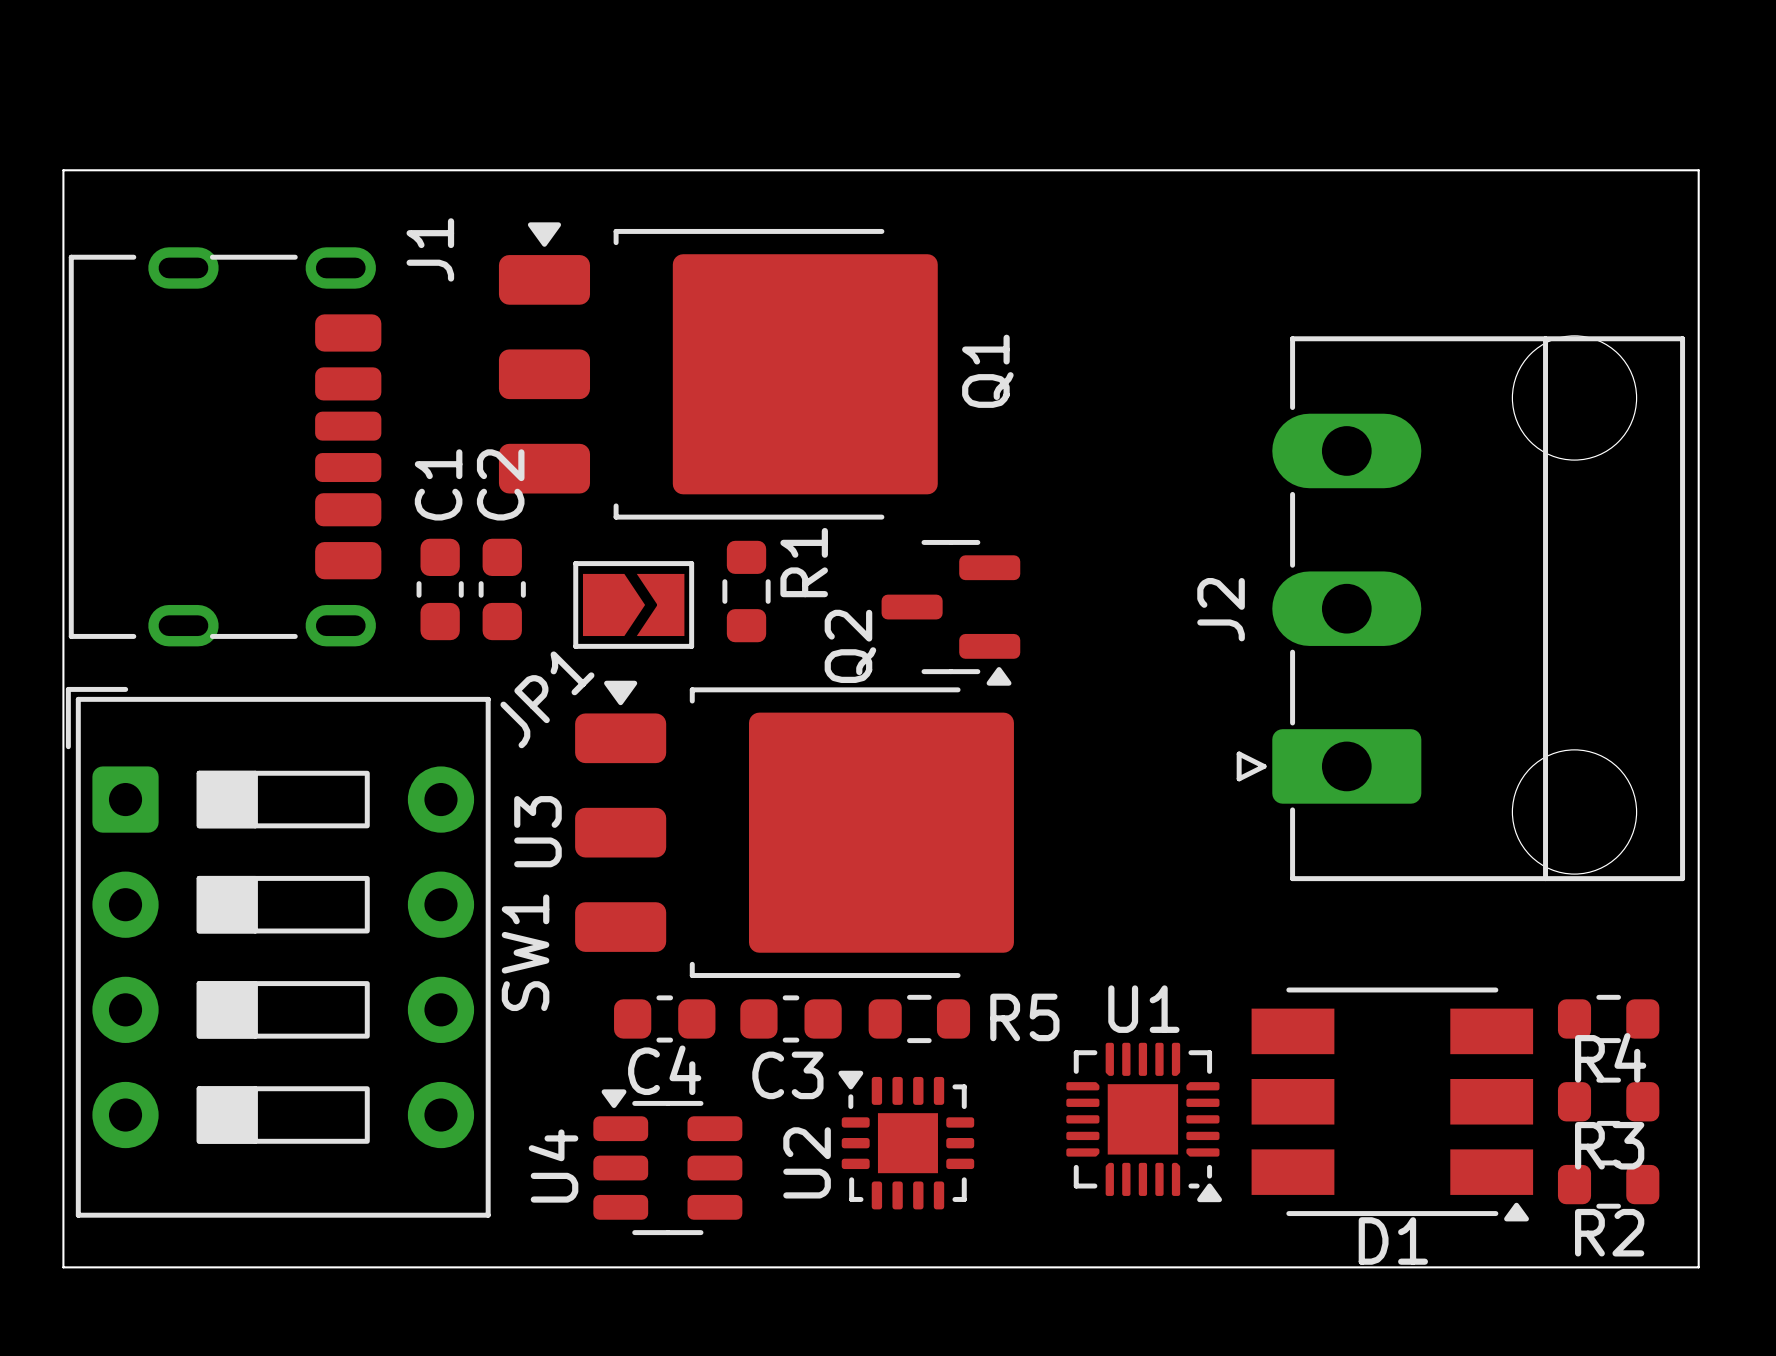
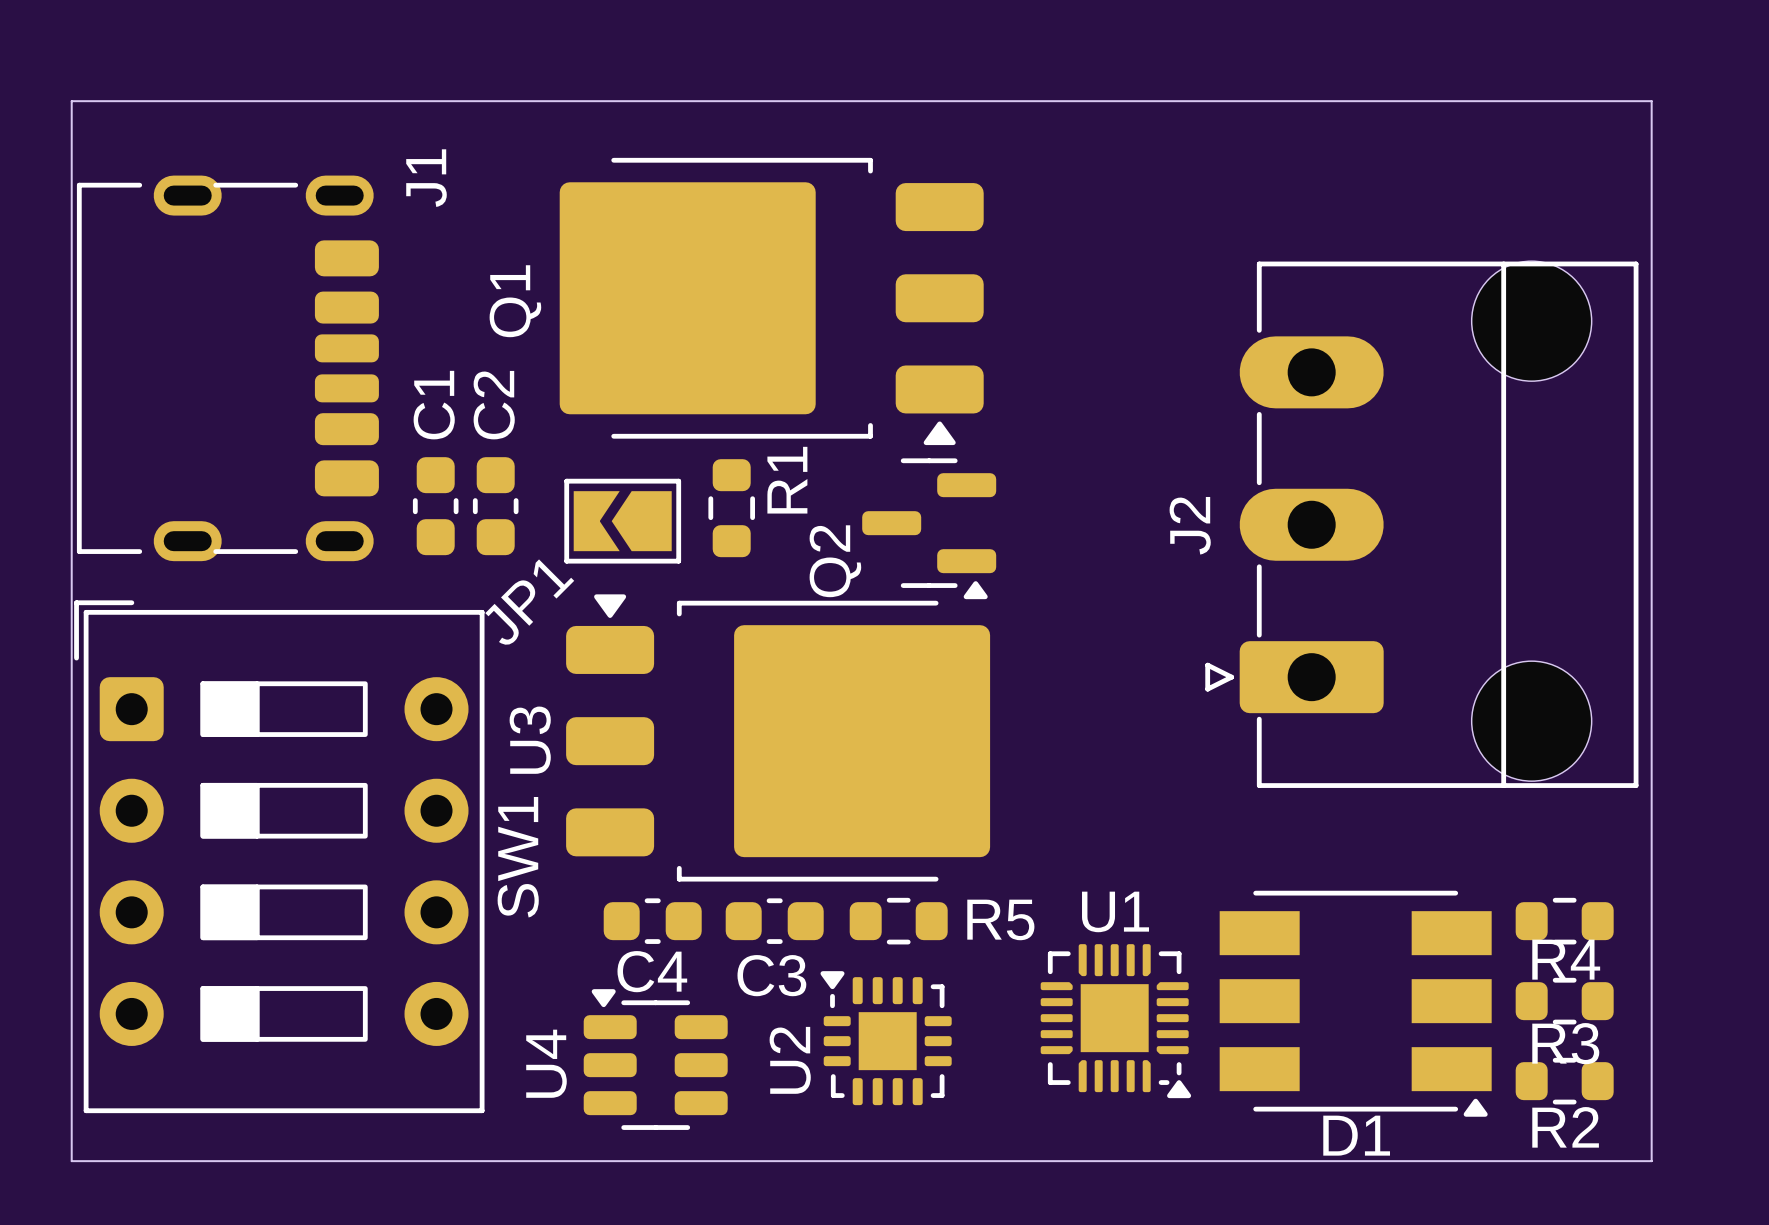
Q1 rotation: 0° (718, 370) -> 180° (771, 301)
JP1 rotation: 0° (633, 604) -> 180° (622, 521)

